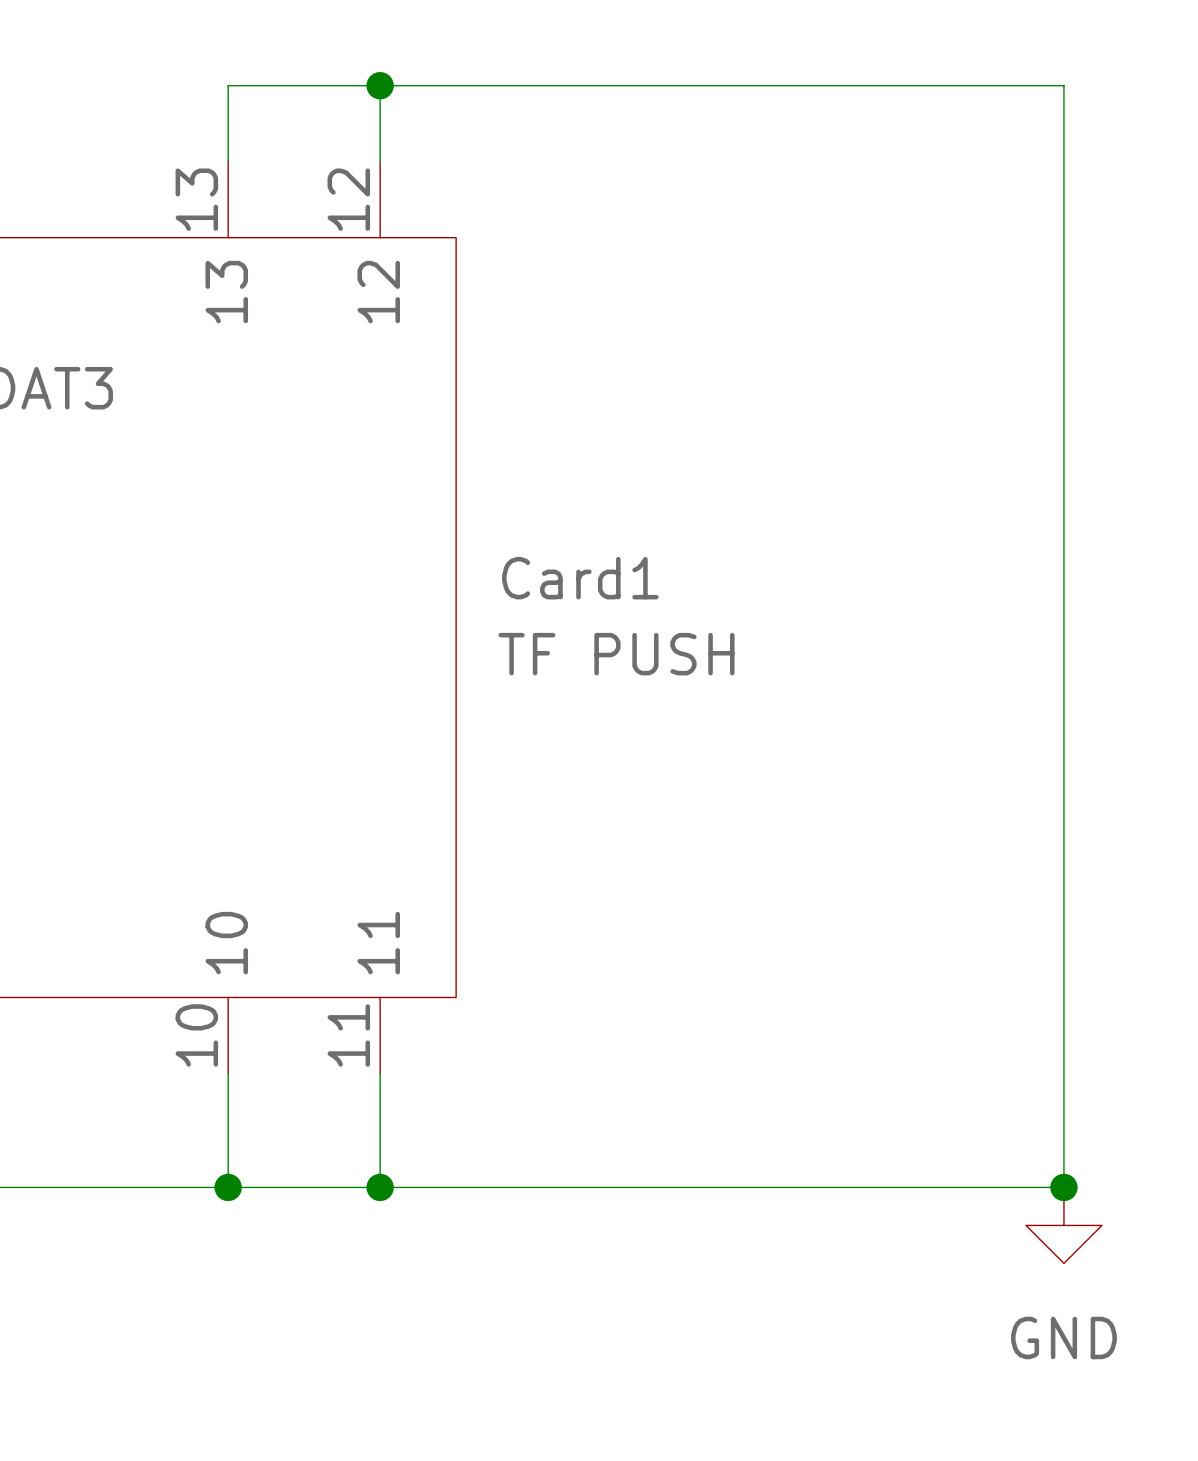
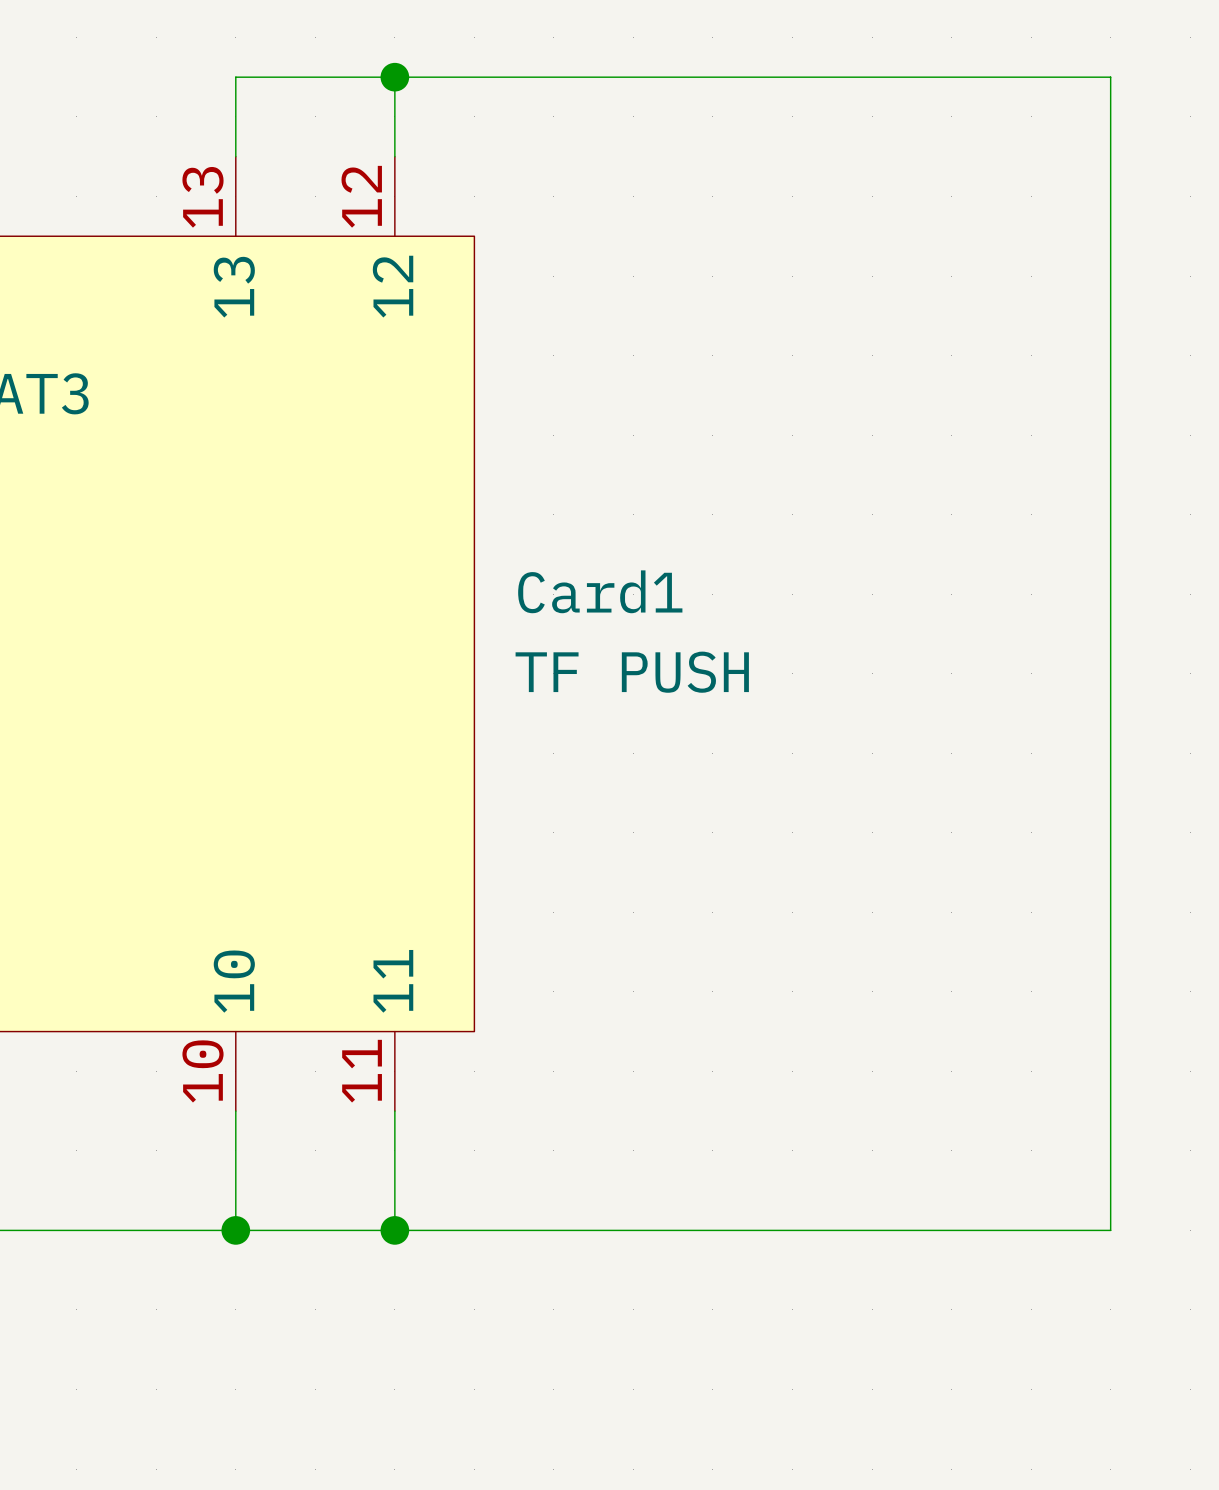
junction: (1063, 1187) -> none
power symbol: GND (1063, 1225) -> none

